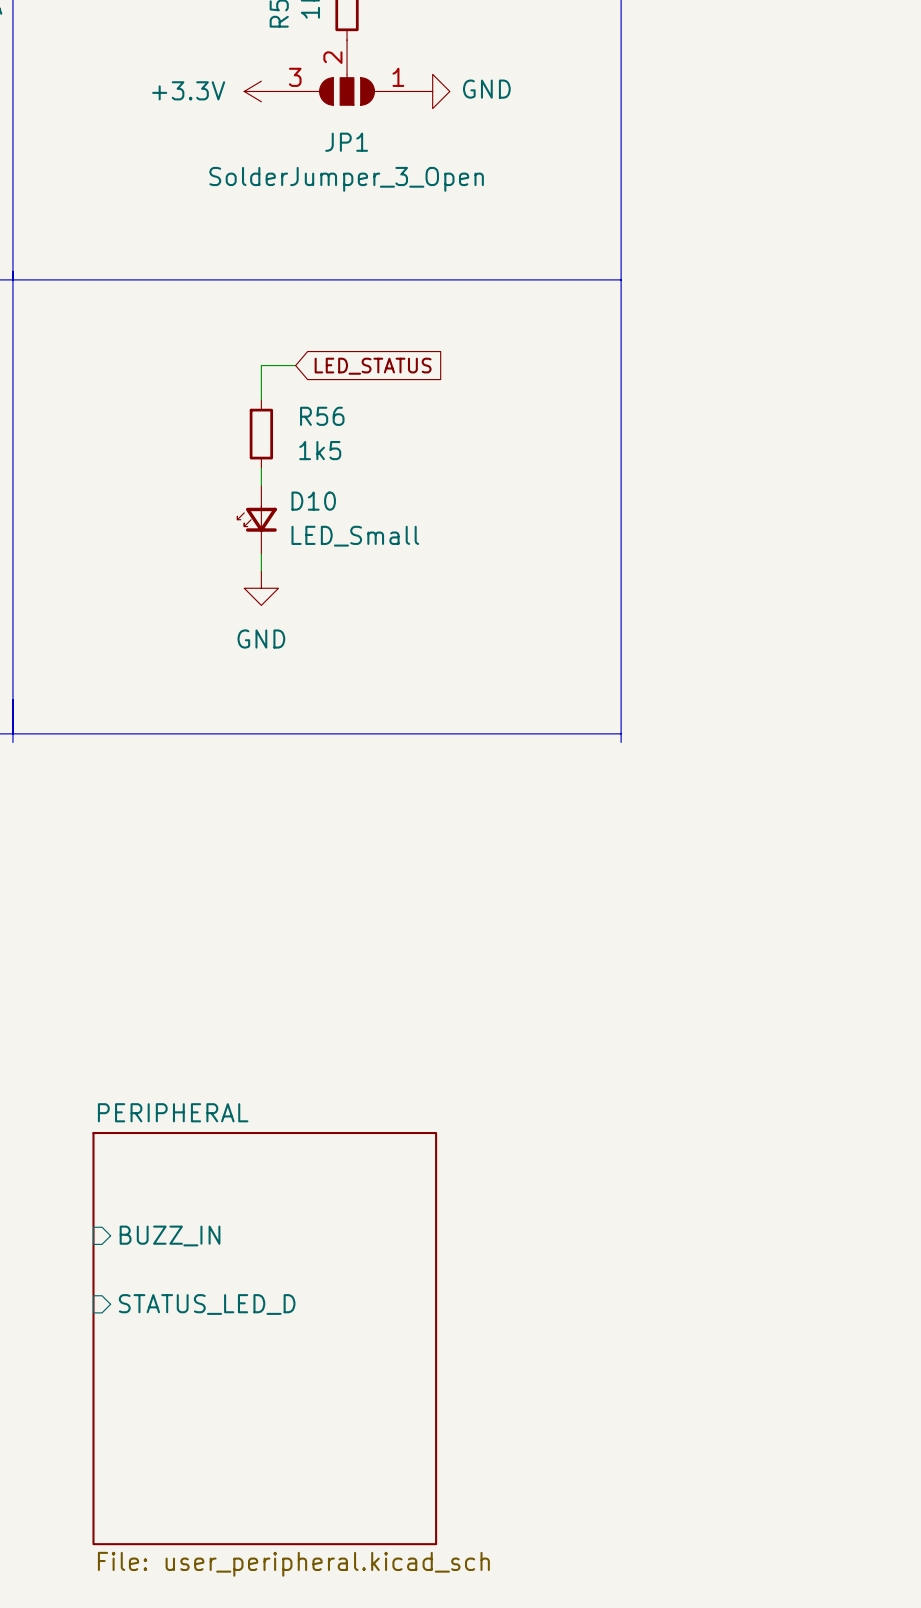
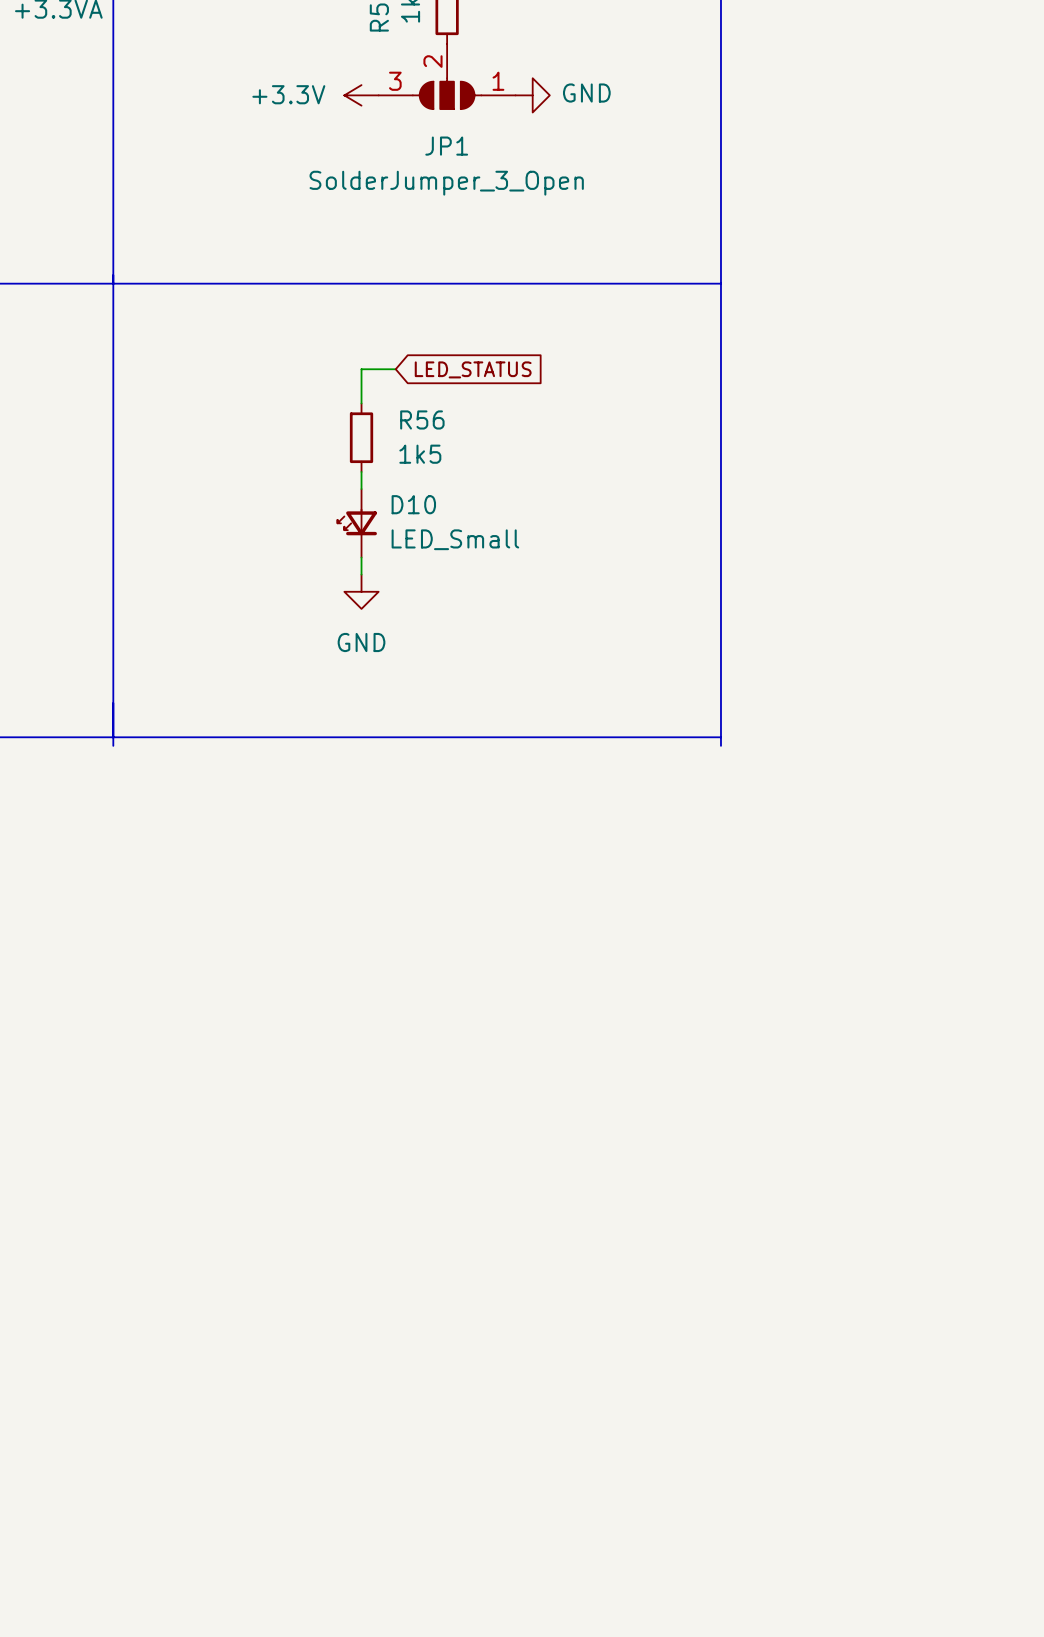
sheet pin: BUZZ_IN (170, 1235) -> none
sheet pin: STATUS_LED_D (207, 1304) -> none
sheet PERIPHERAL: File: user_peripheral.kicad_sch (264, 1338) -> none

